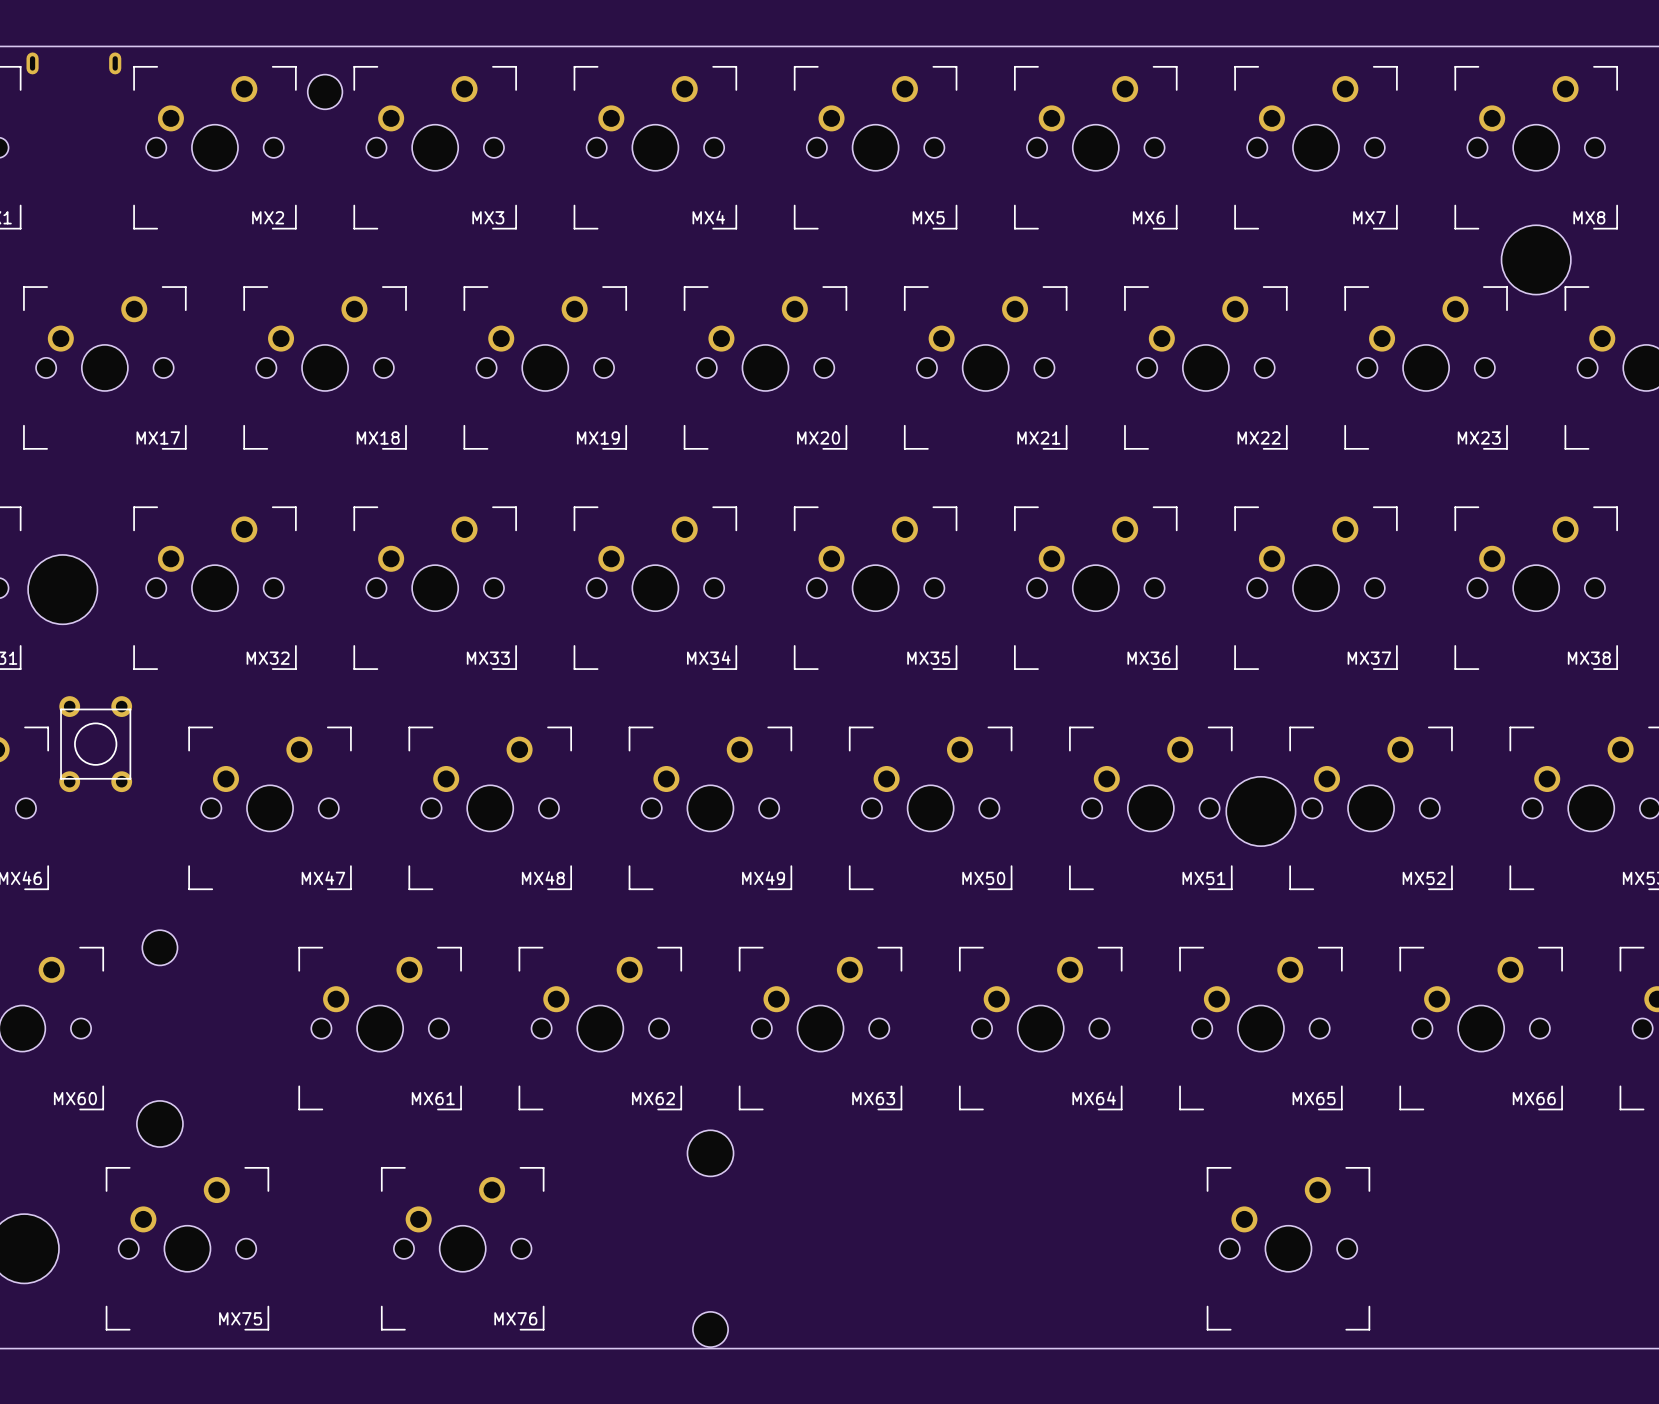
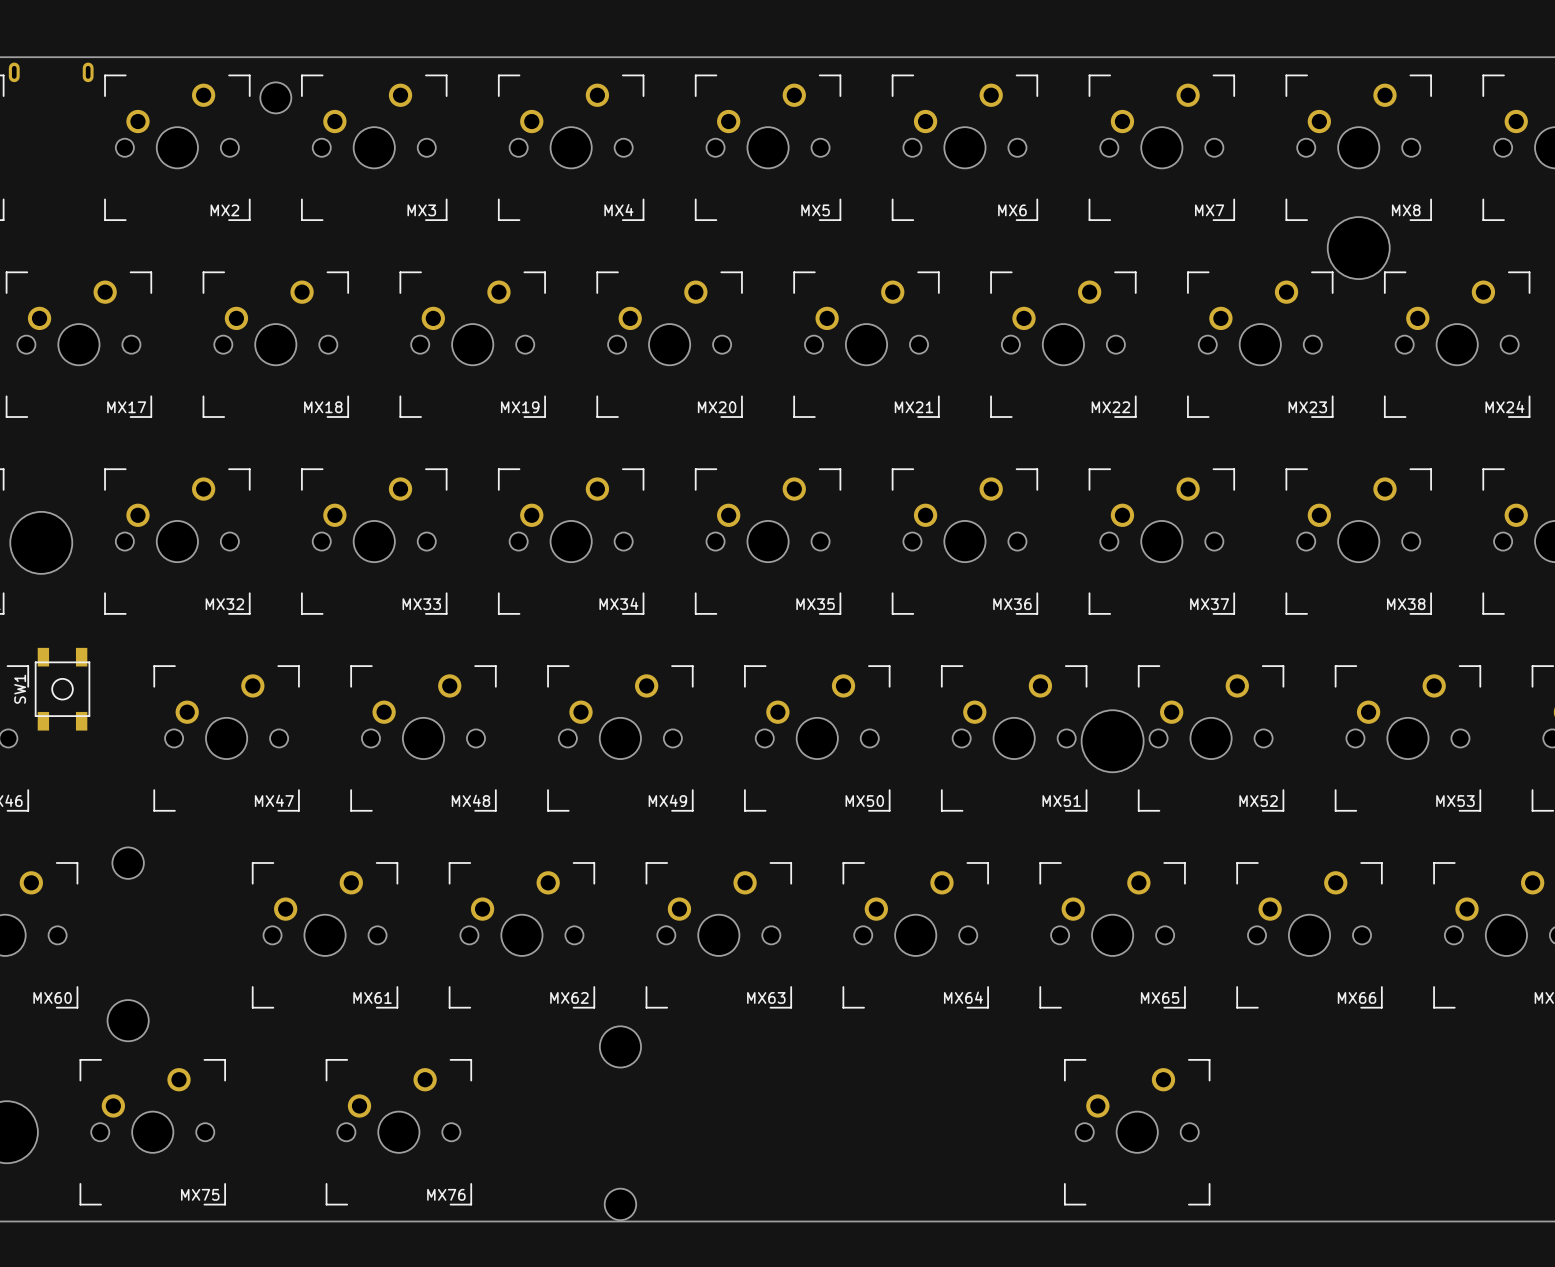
part: (95, 744) -> none
SW1: none -> (62, 689)

